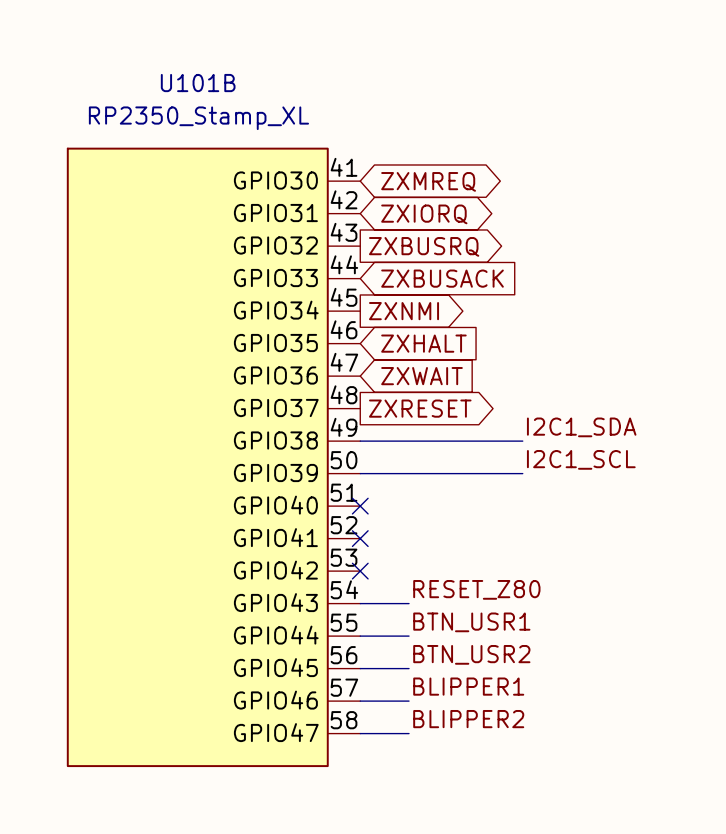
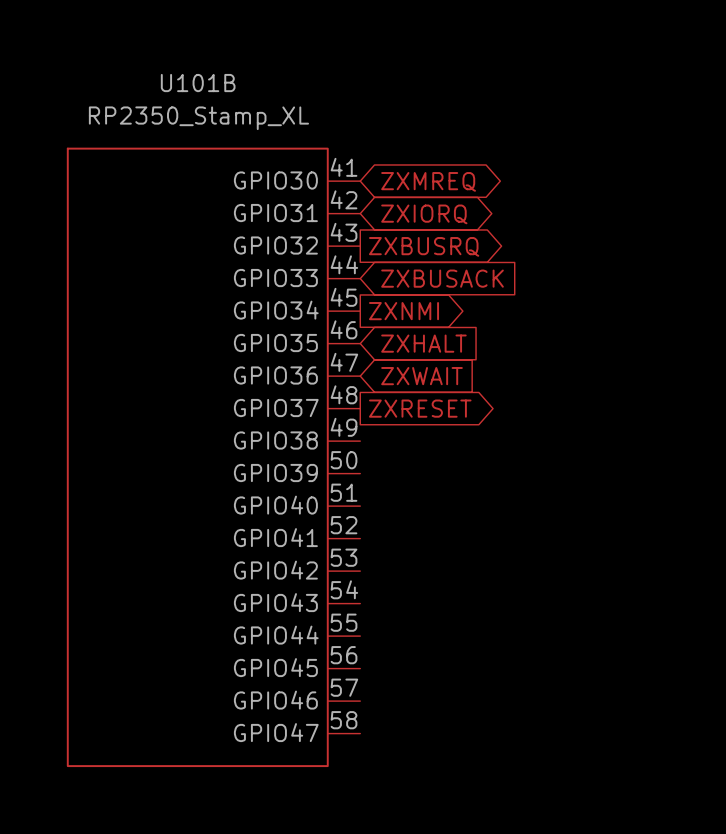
label: I2C1_SDA (581, 427) -> none
wire: (360, 441) (522, 441) -> none
label: I2C1_SCL (581, 459) -> none
wire: (360, 473) (522, 473) -> none
no-connect mark: (360, 506) -> none
no-connect mark: (360, 538) -> none
no-connect mark: (360, 571) -> none
label: RESET_Z80 (476, 589) -> none
wire: (360, 603) (409, 603) -> none
label: BTN_USR1 (471, 622) -> none
wire: (360, 636) (409, 636) -> none
label: BTN_USR2 (471, 654) -> none
wire: (360, 668) (409, 668) -> none
label: BLIPPER1 (468, 686) -> none
wire: (360, 701) (409, 701) -> none
label: BLIPPER2 (468, 719) -> none
wire: (360, 733) (409, 733) -> none

